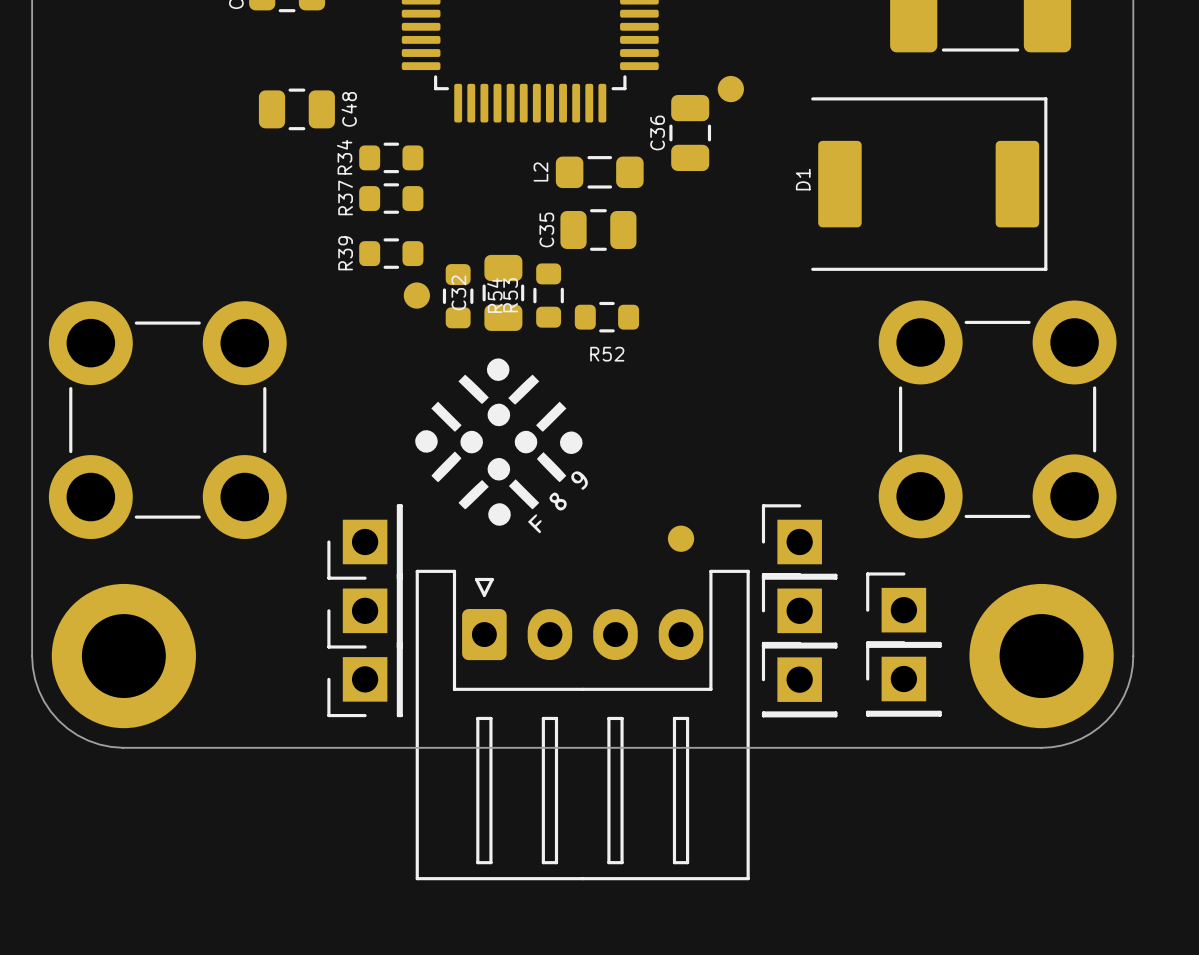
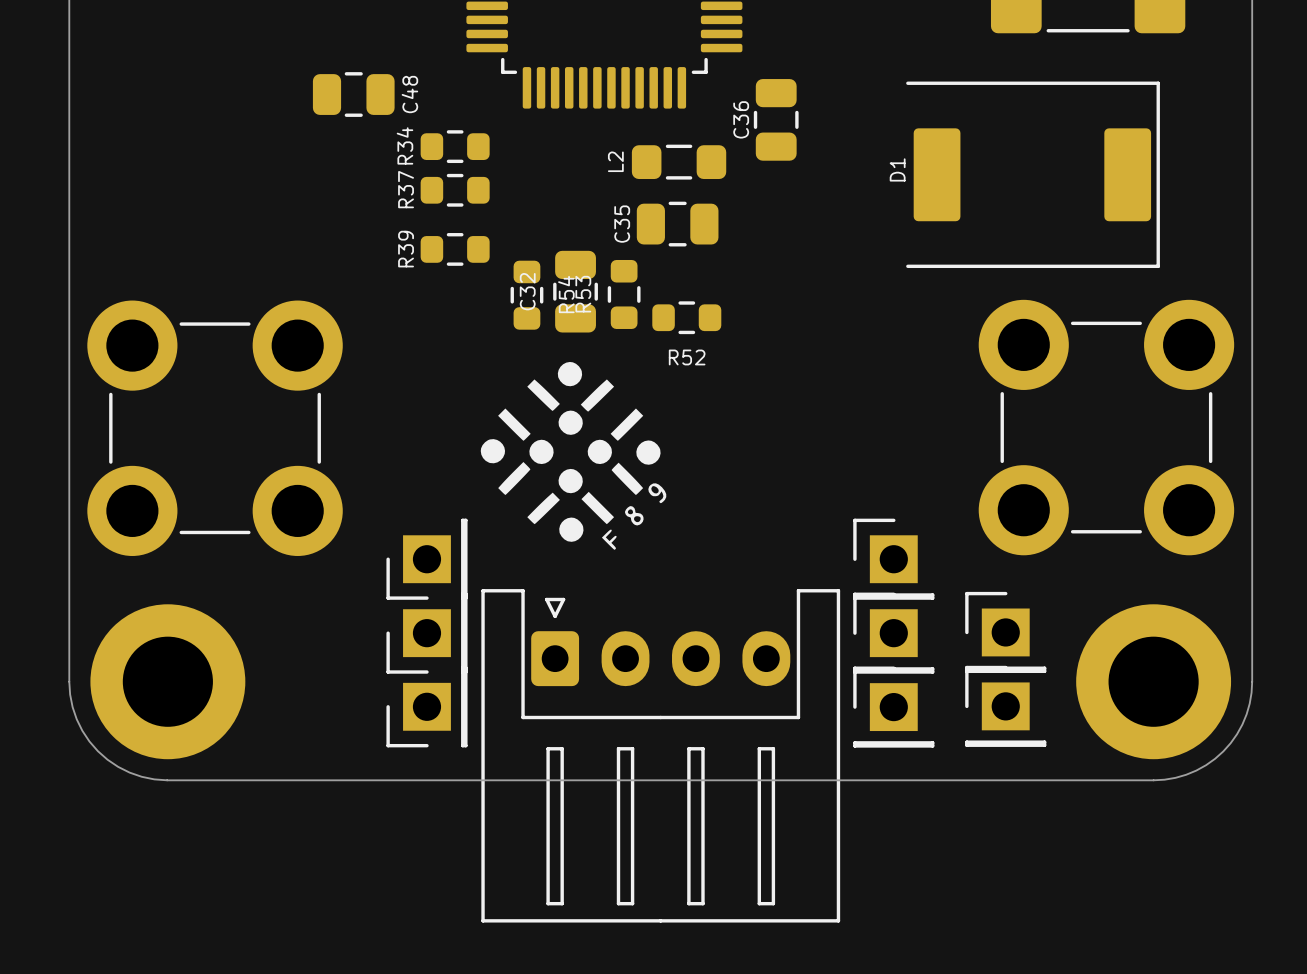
part: (730, 89) -> none
part: (416, 295) -> none
part: (681, 538) -> none

